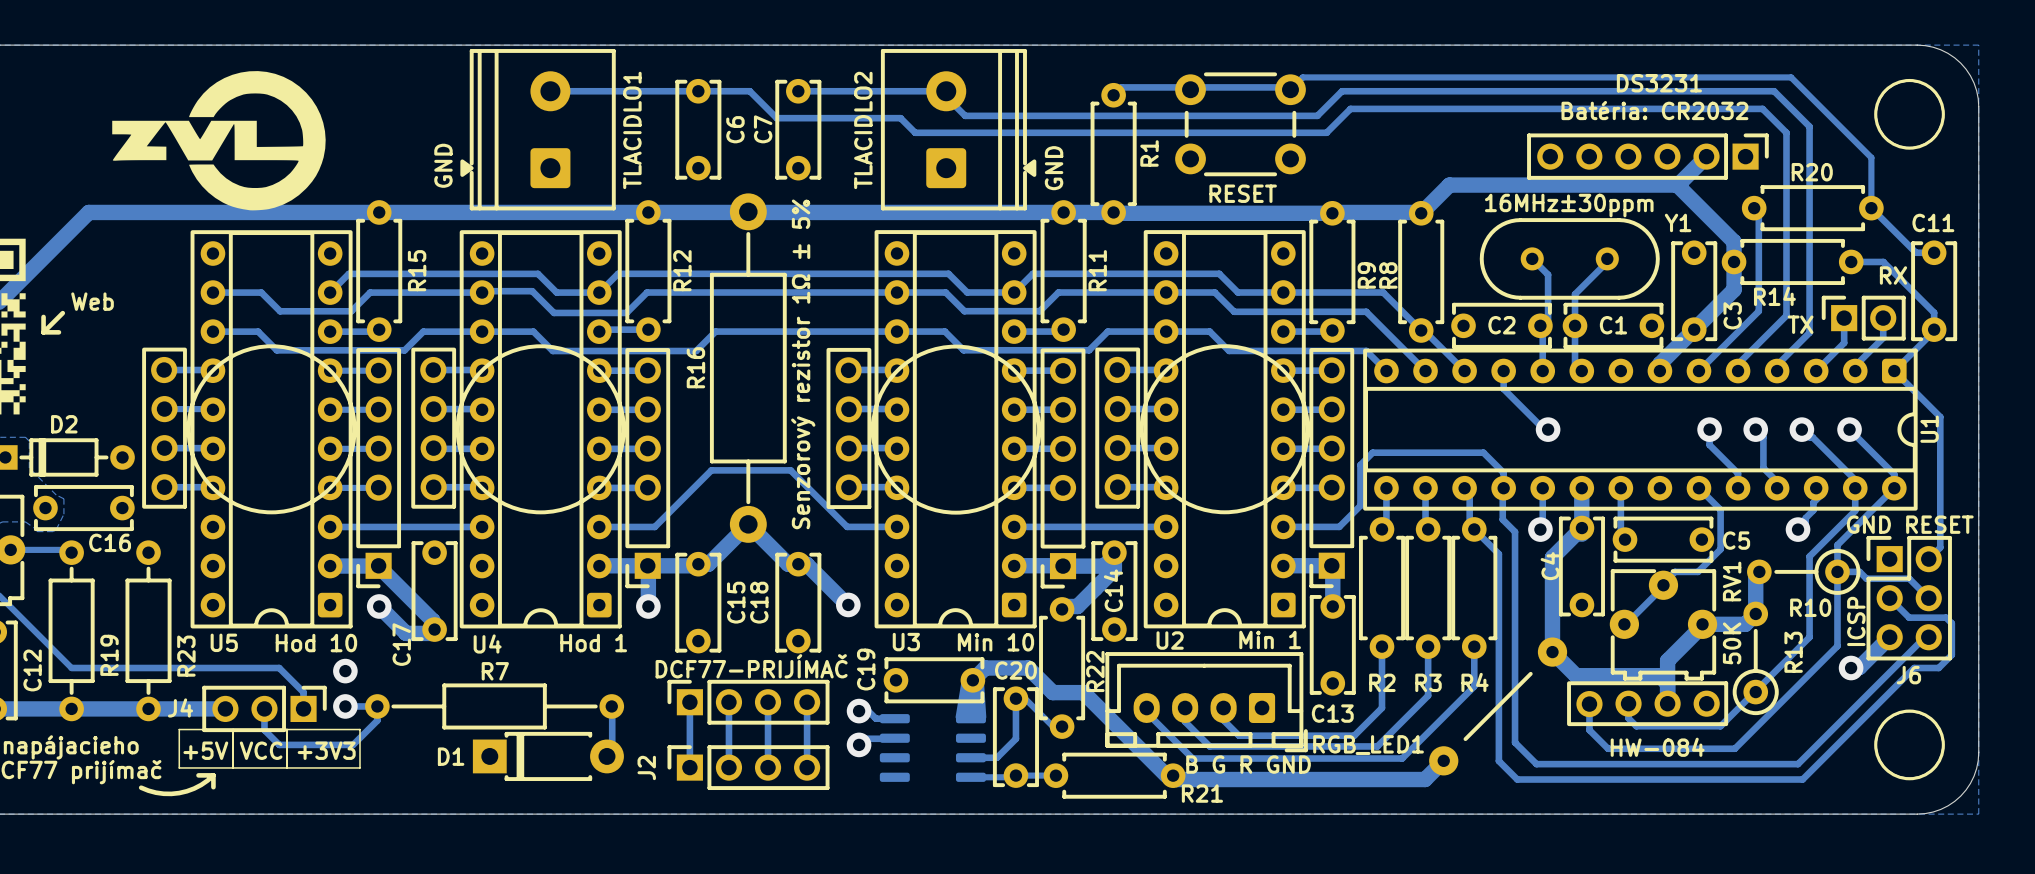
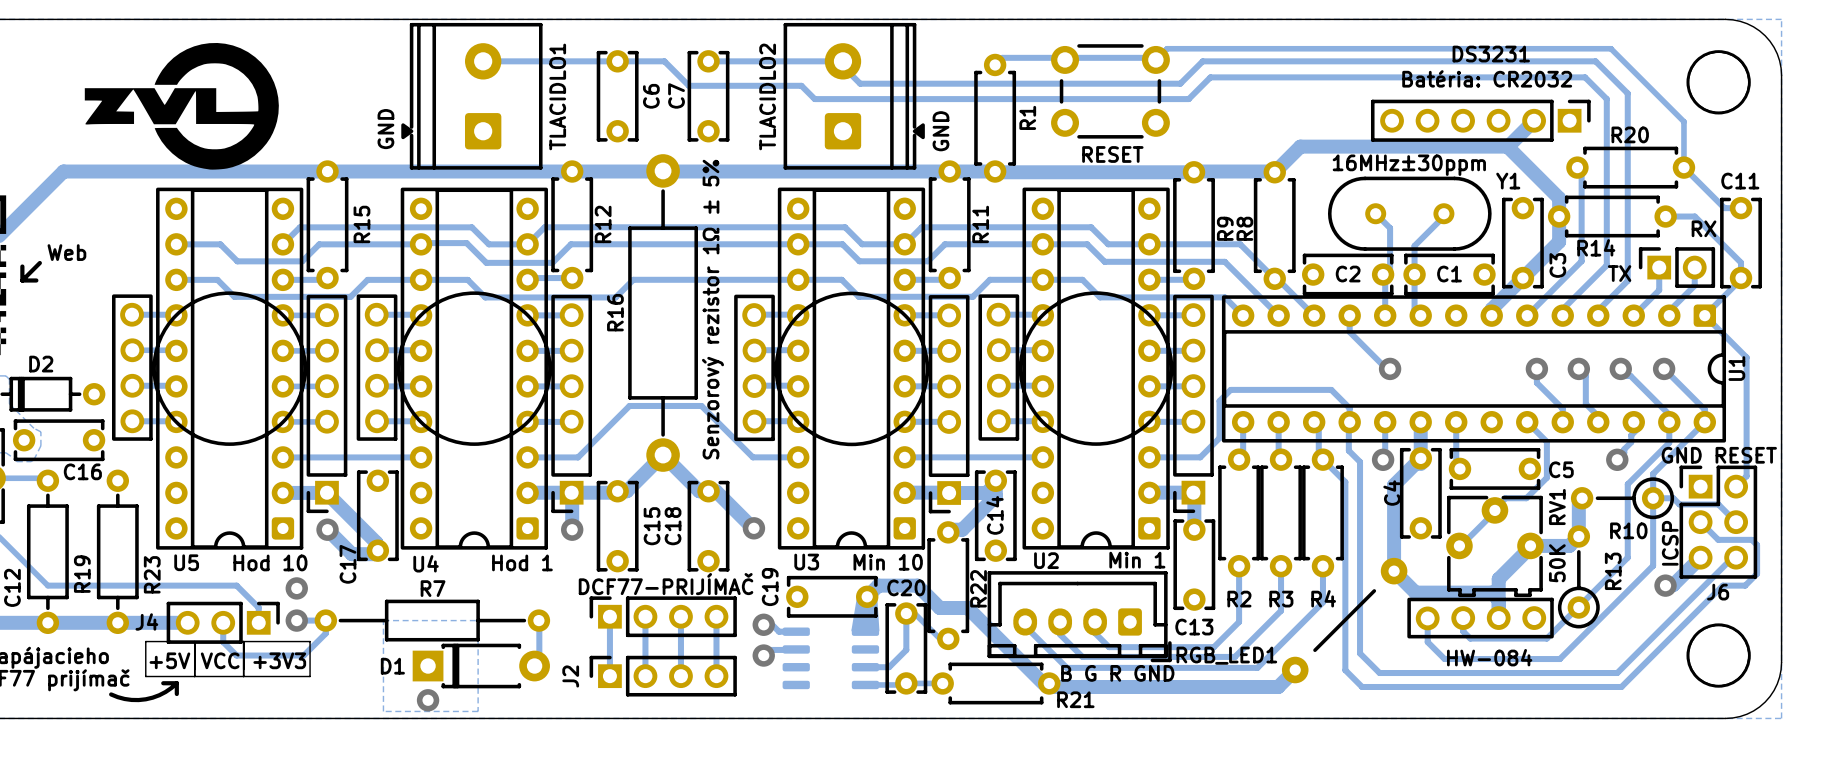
bottom zone outline: none -> (383, 620) (478, 620) (478, 711) (383, 711) (383, 620)
via: none -> (428, 700)

